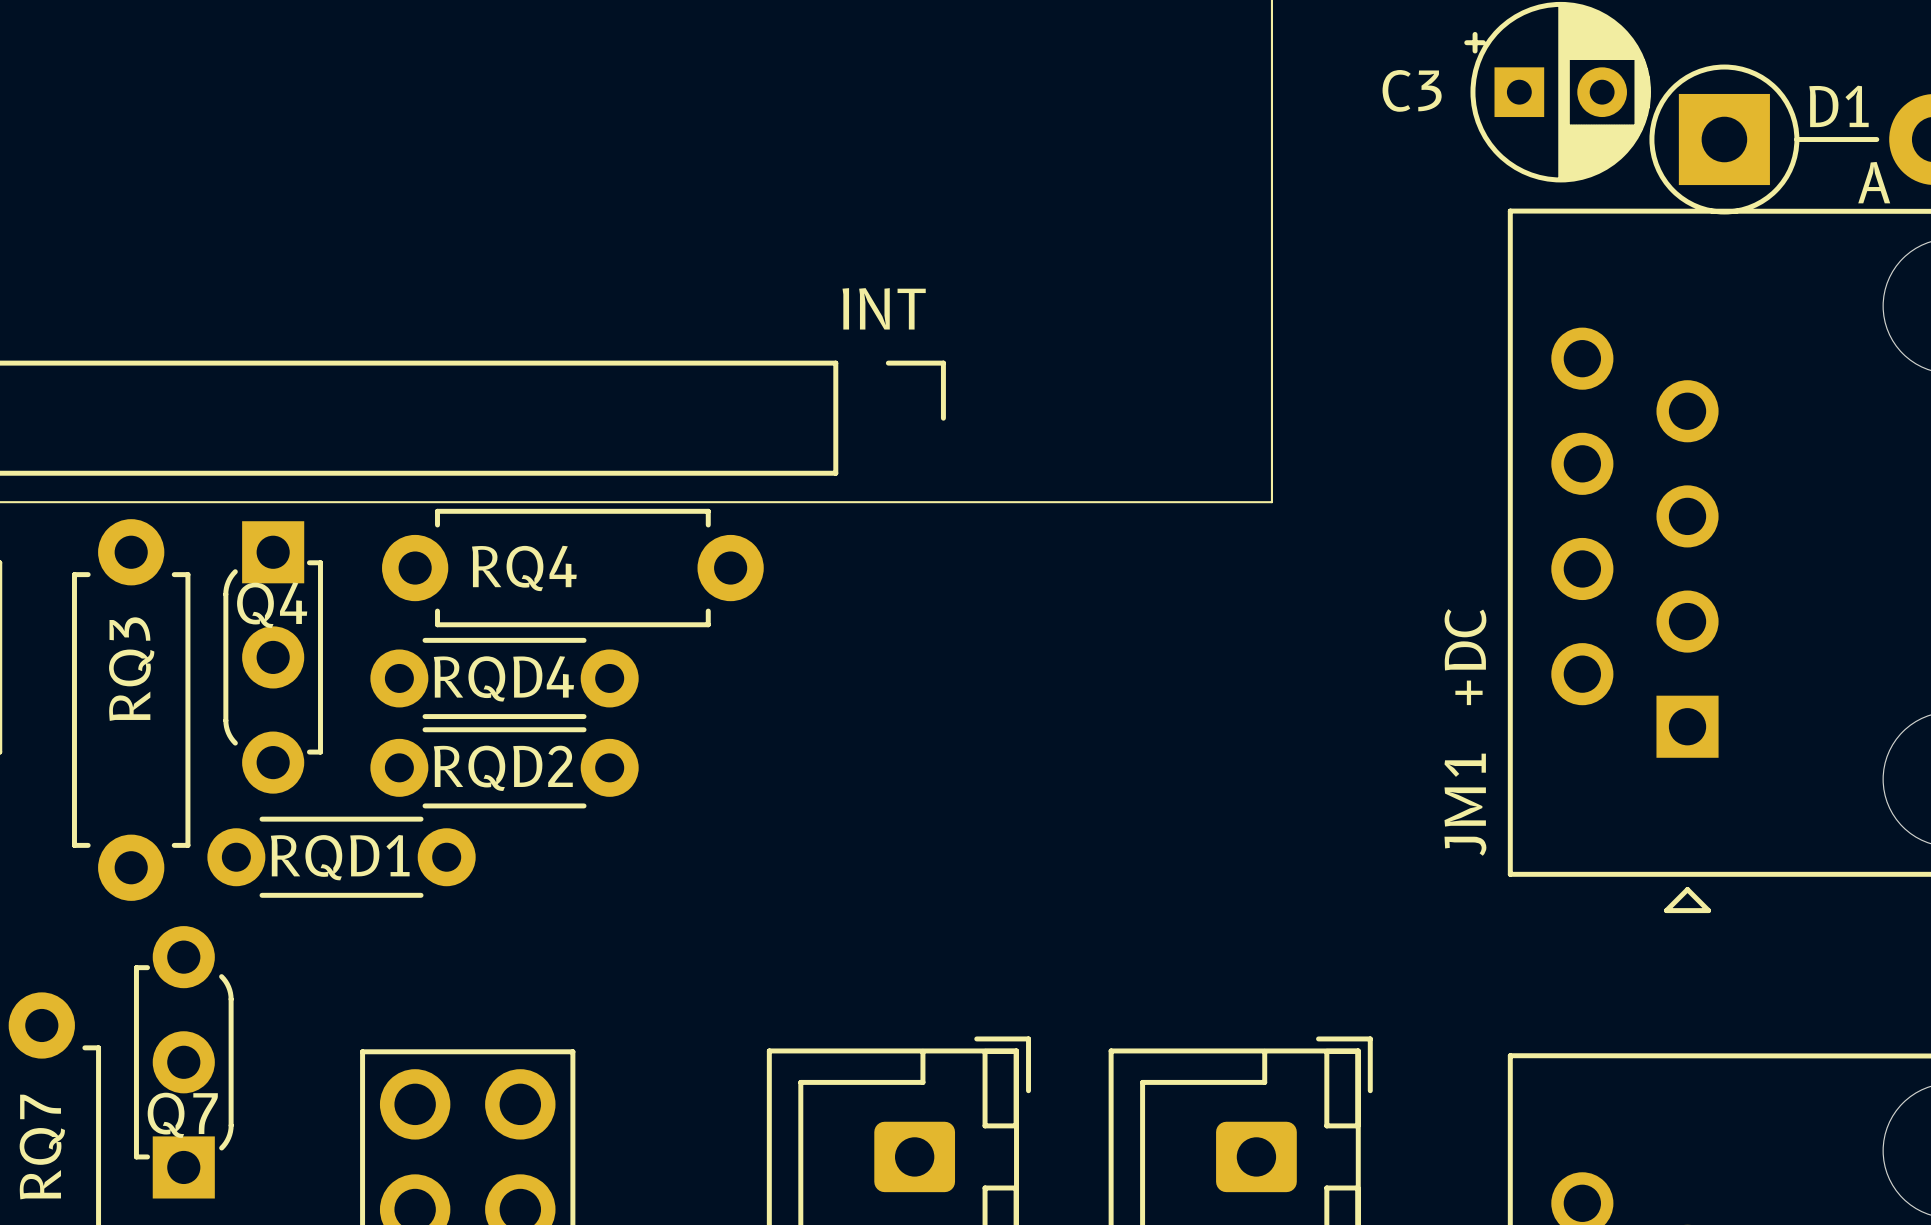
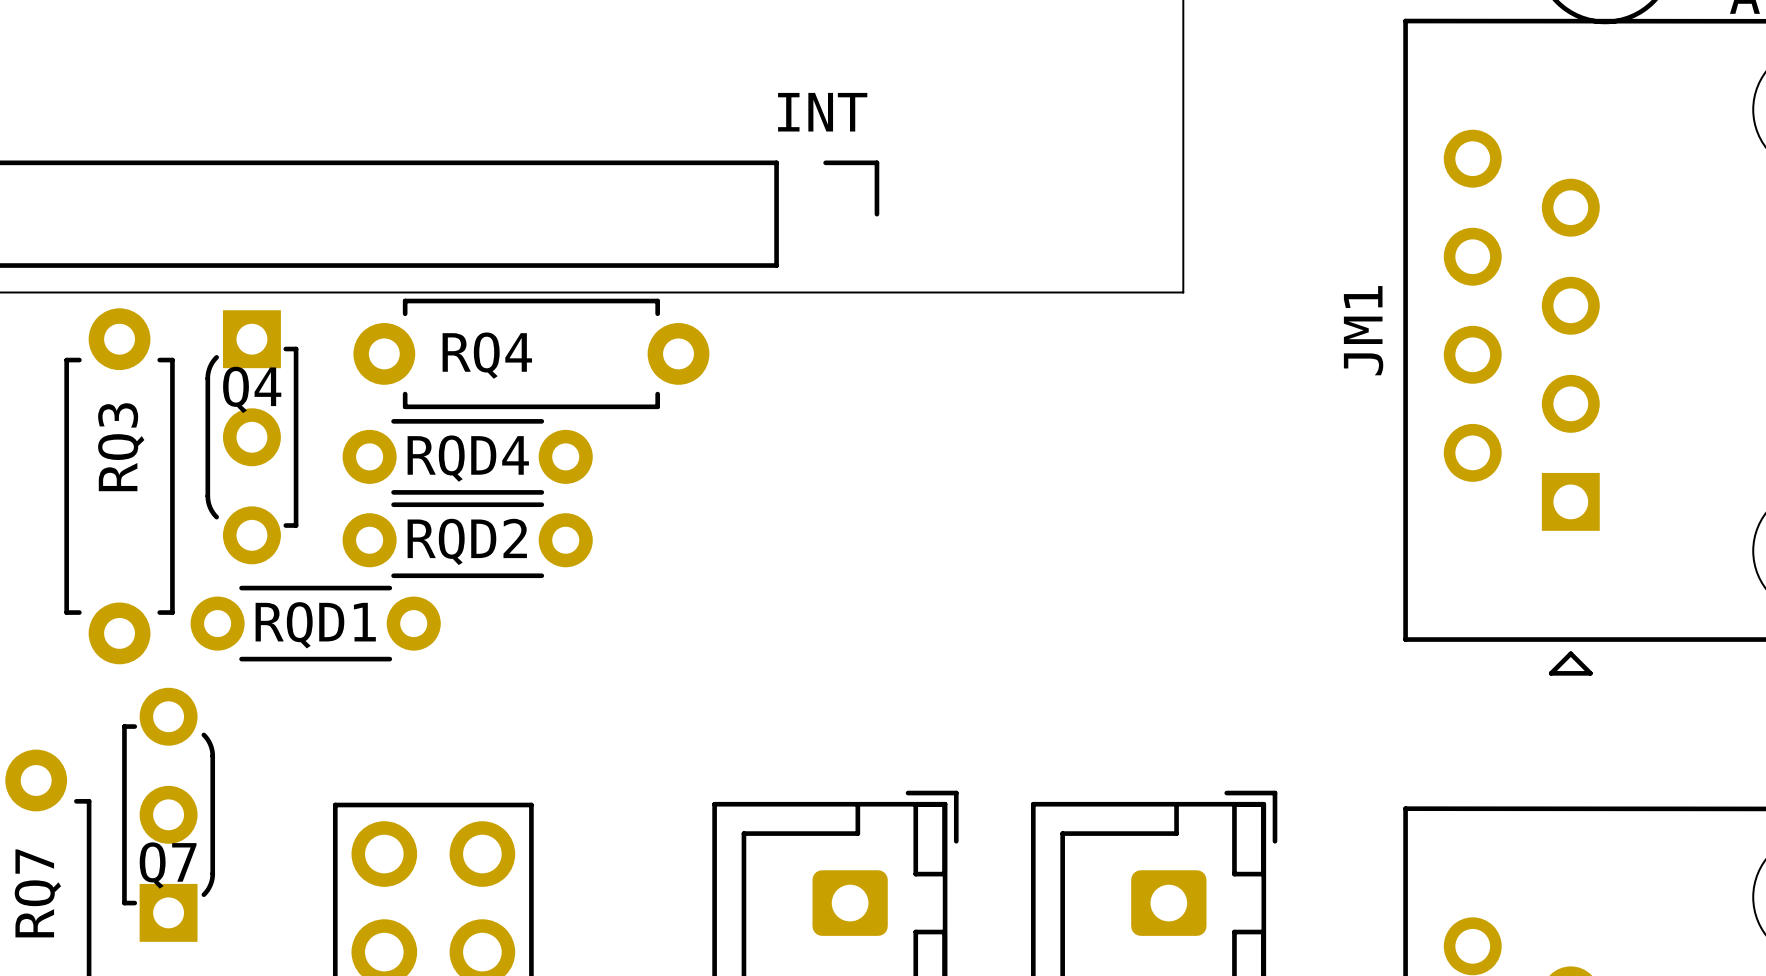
text: +DC (1465, 657) -> none
JM1 name position: JM1 (1465, 804) -> JM1 (1363, 330)

